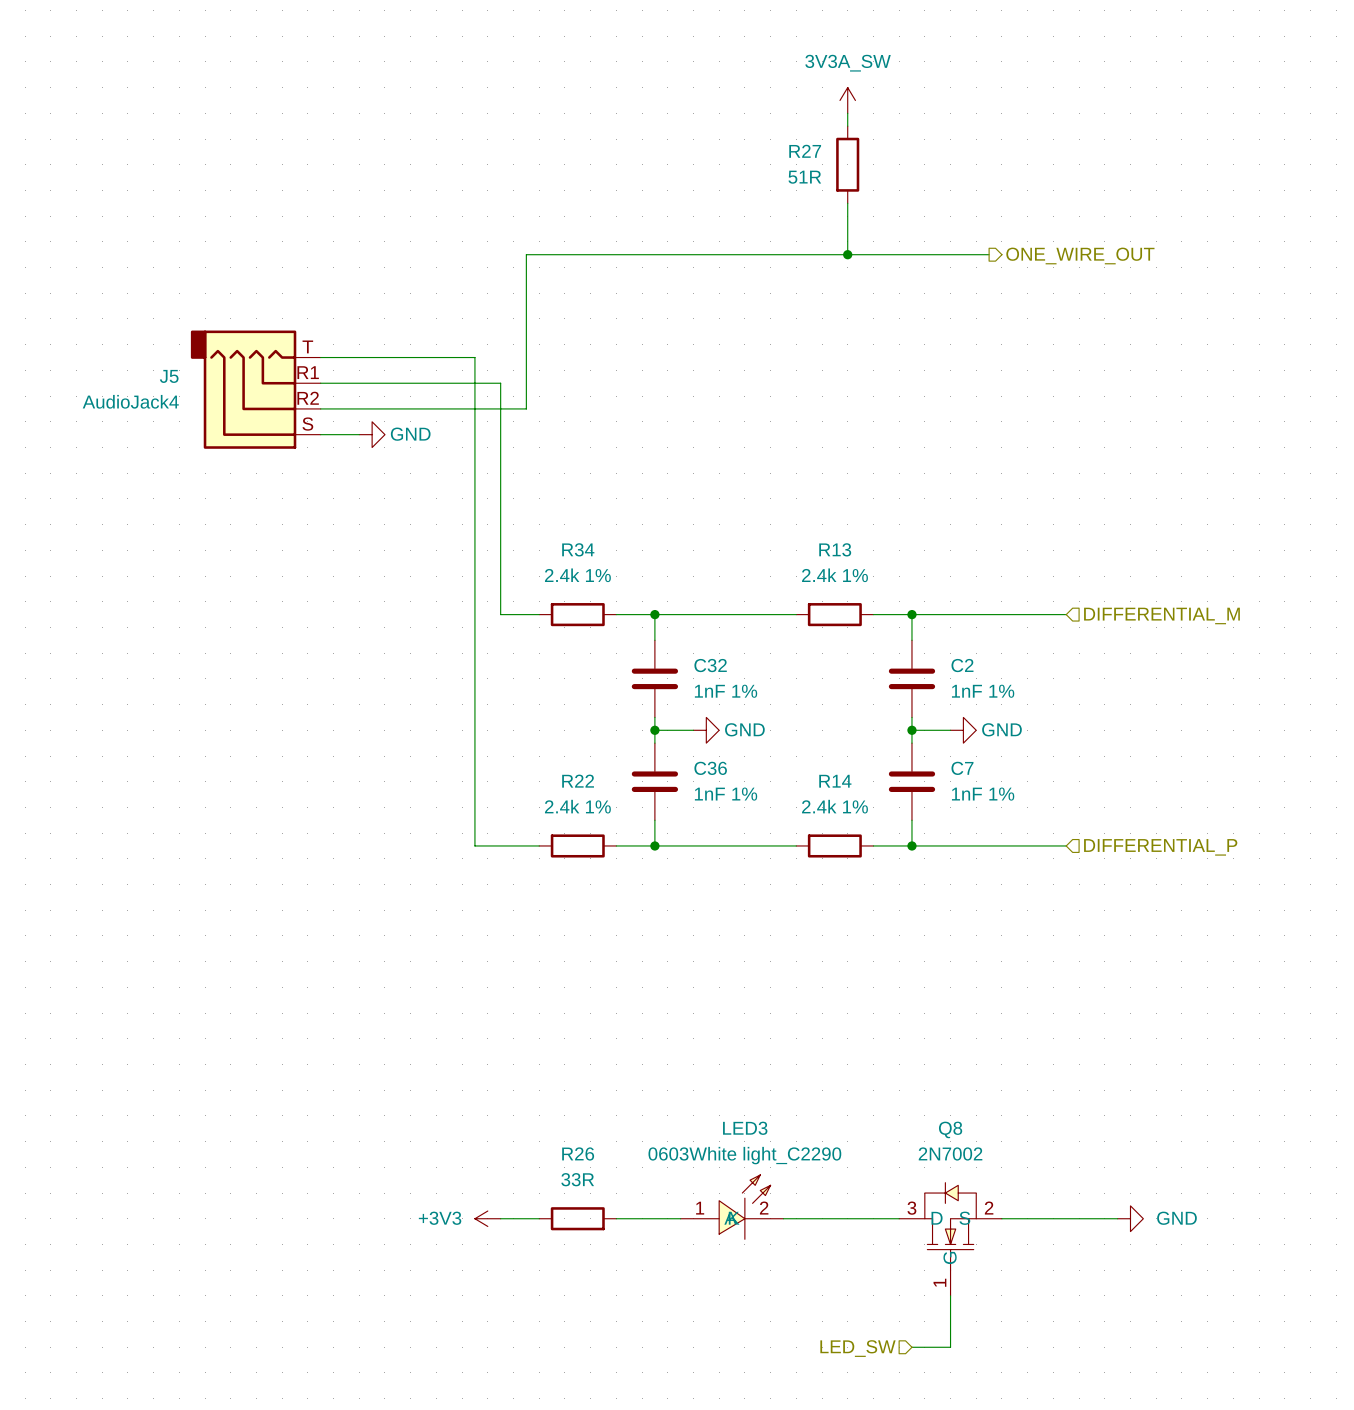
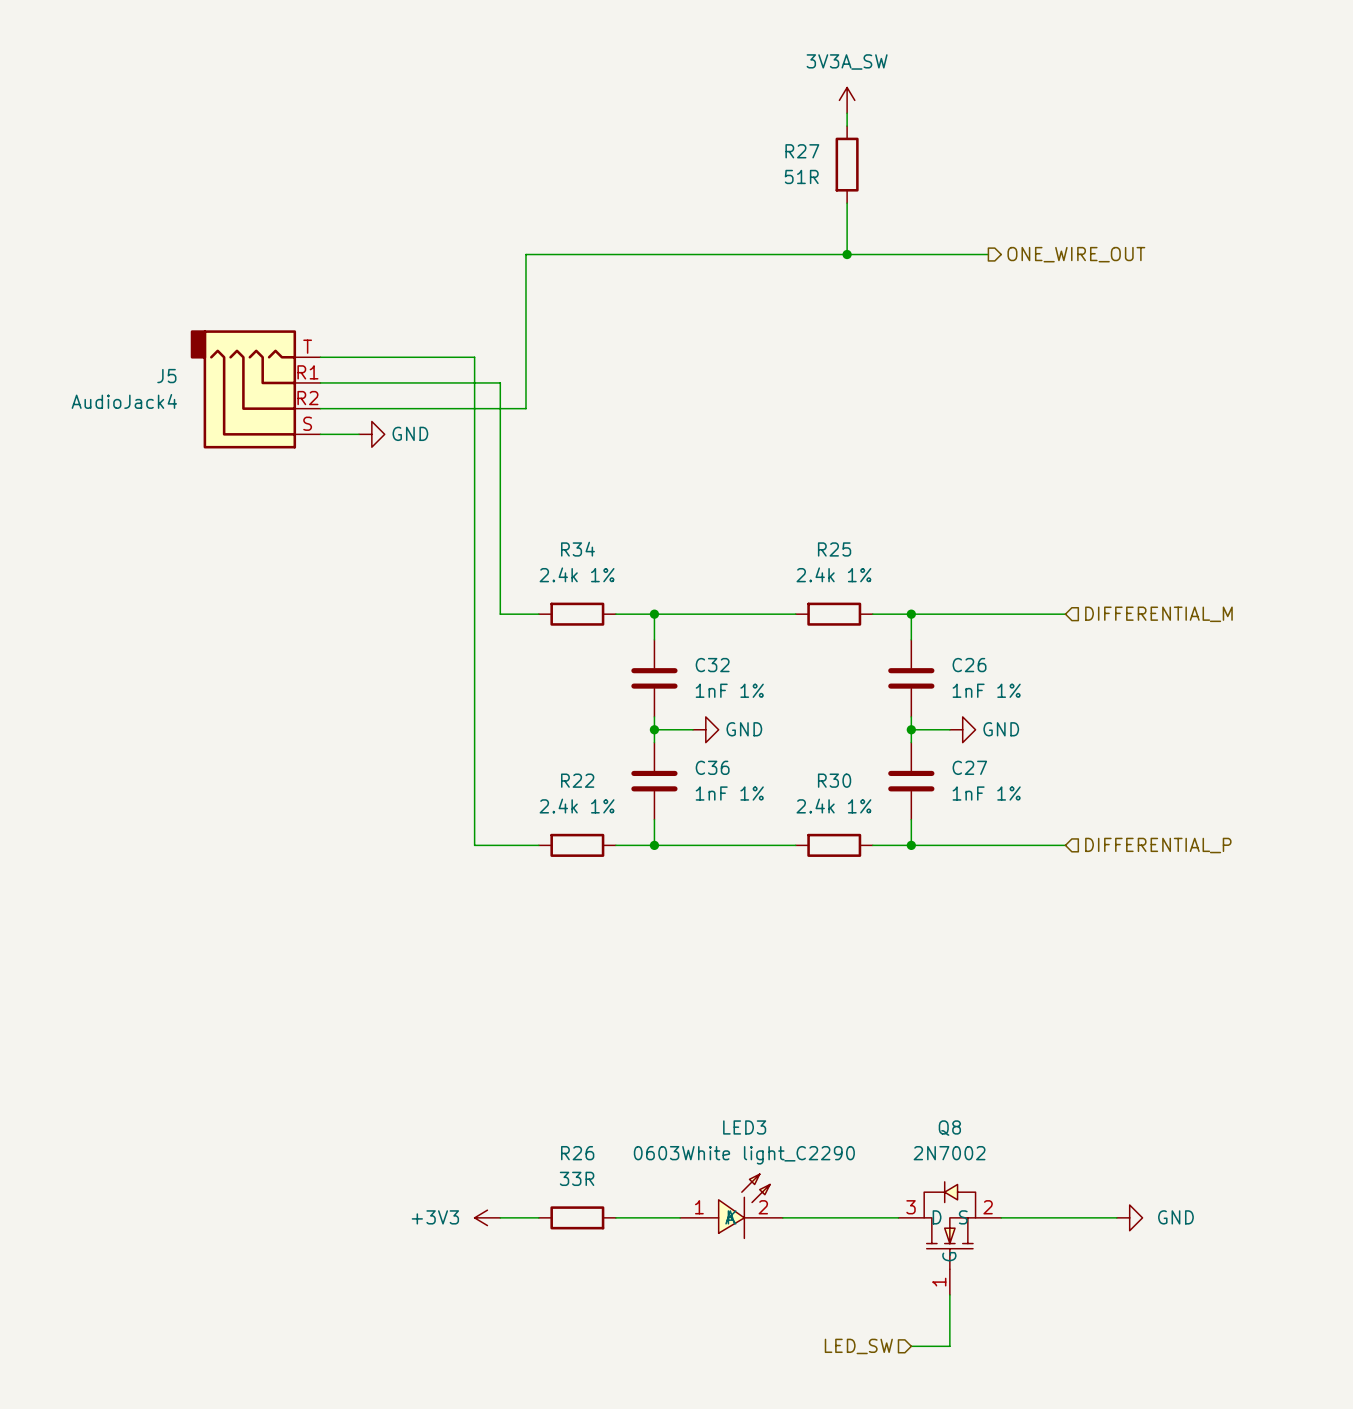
R13 name: R13 (835, 549) -> R25 (834, 549)
C2 name: C2 (962, 665) -> C26 (969, 665)
C7 name: C7 (962, 768) -> C27 (969, 767)
R14 name: R14 (835, 781) -> R30 (834, 780)

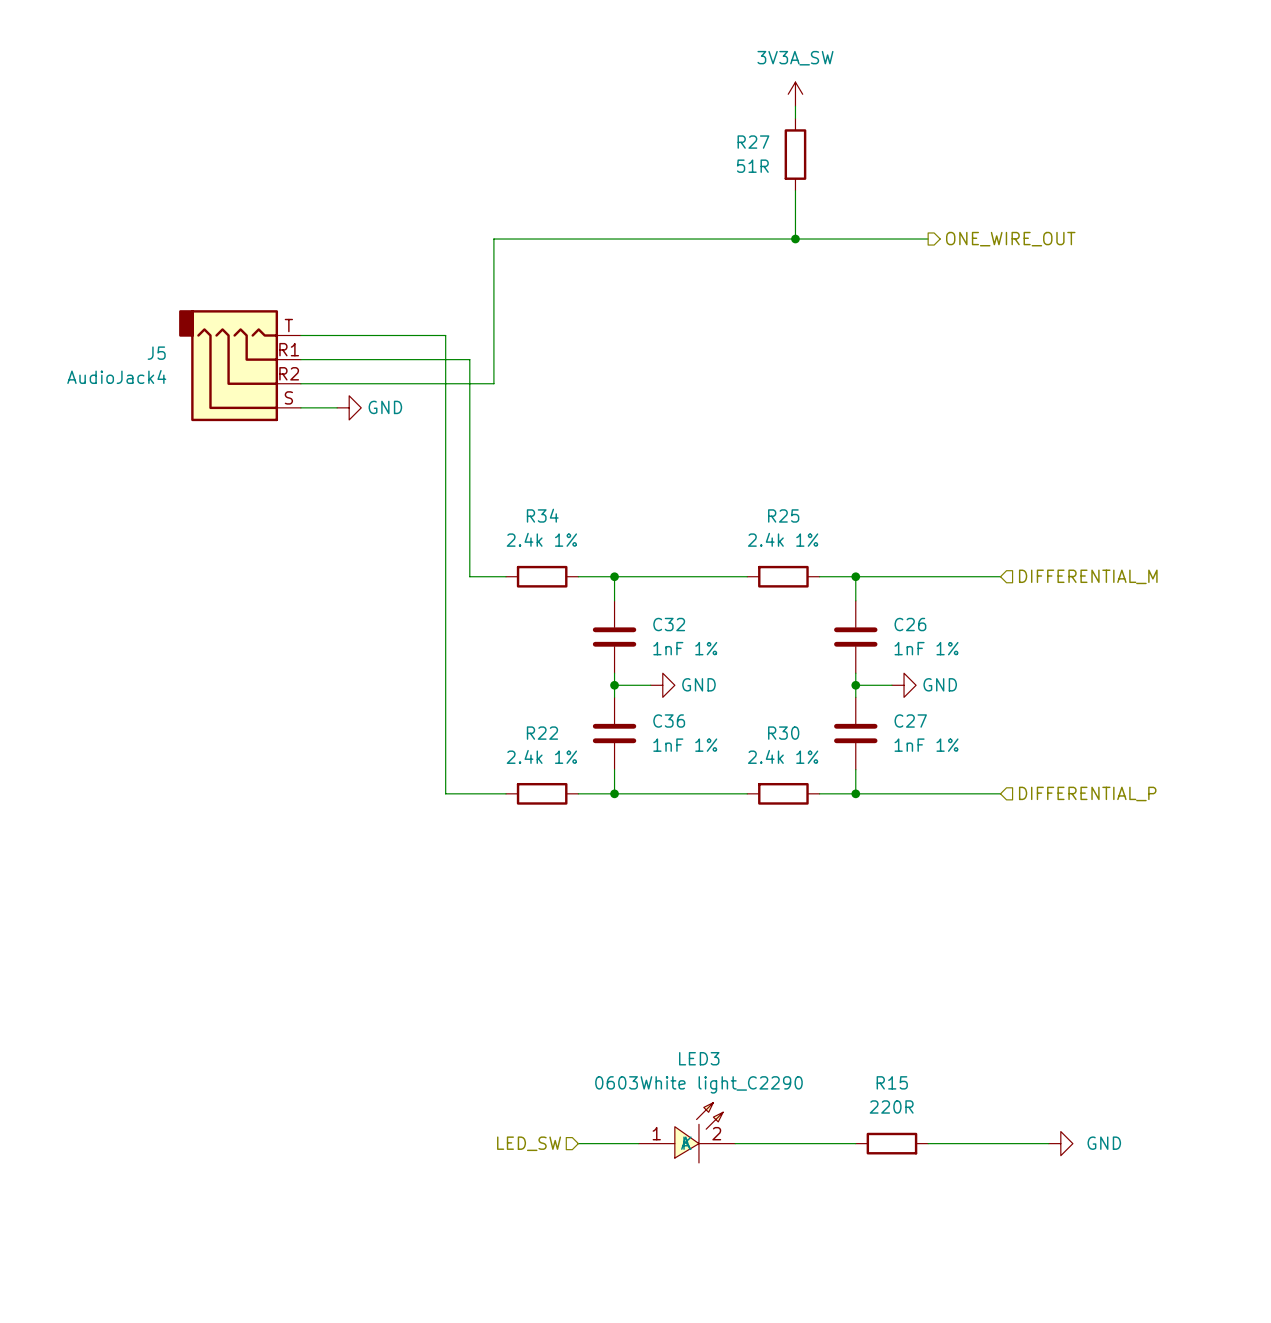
power symbol: +3V3 (487, 1217) -> none
wire: (500, 1217) (538, 1217) -> none
R26: 33R (577, 1217) -> none
R15: none -> 220R (891, 1143)
hierarchical label: none -> LED_SW (529, 1143)
Q8: 2N7002 (949, 1238) -> none
wire: (949, 1294) (949, 1346) (911, 1346) -> none
hierarchical label: LED_SW (858, 1346) -> none

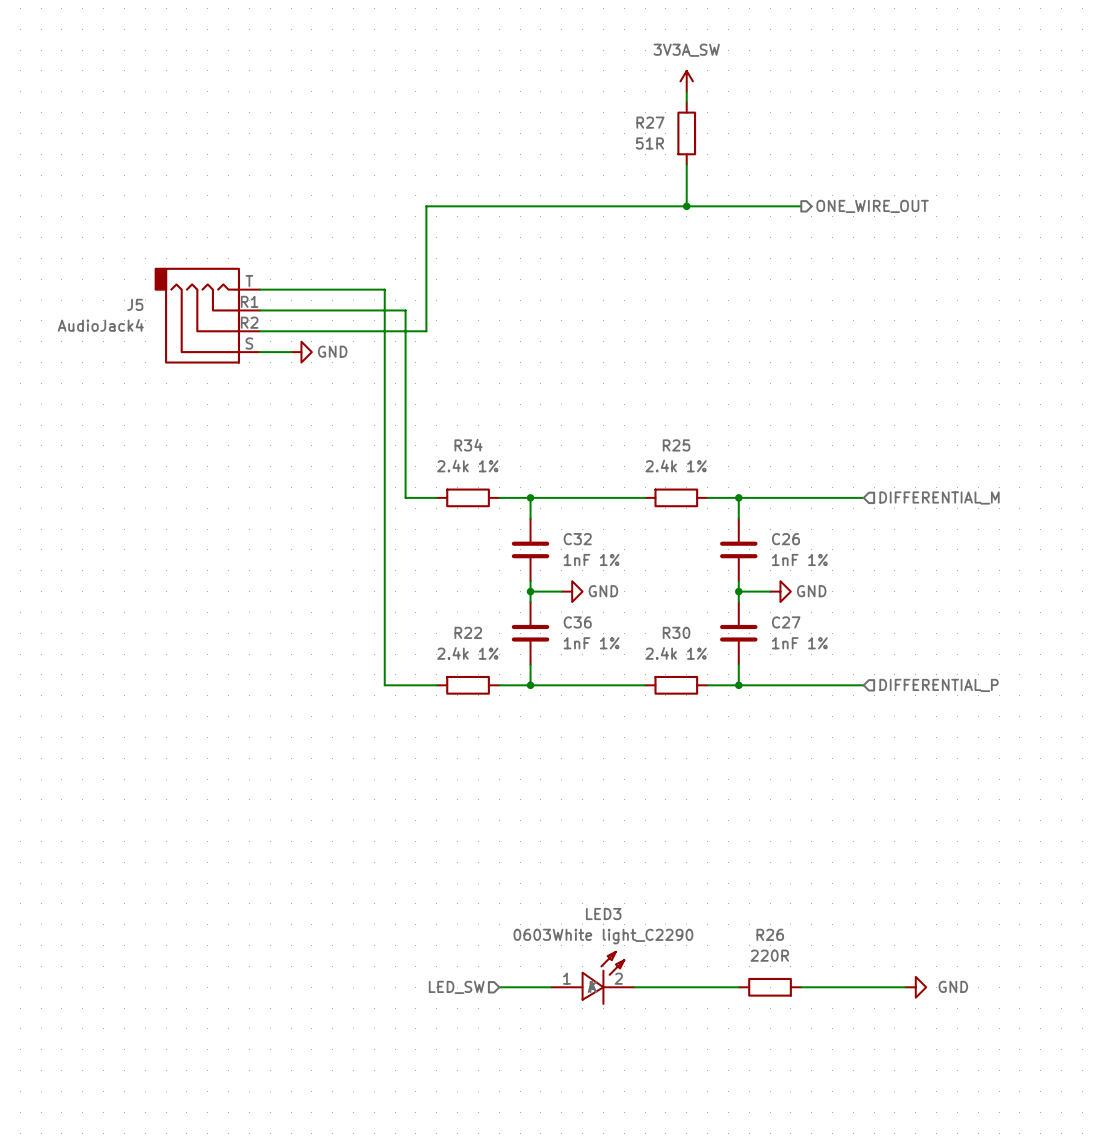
R15 name: R15 (892, 1082) -> R26 (770, 934)

